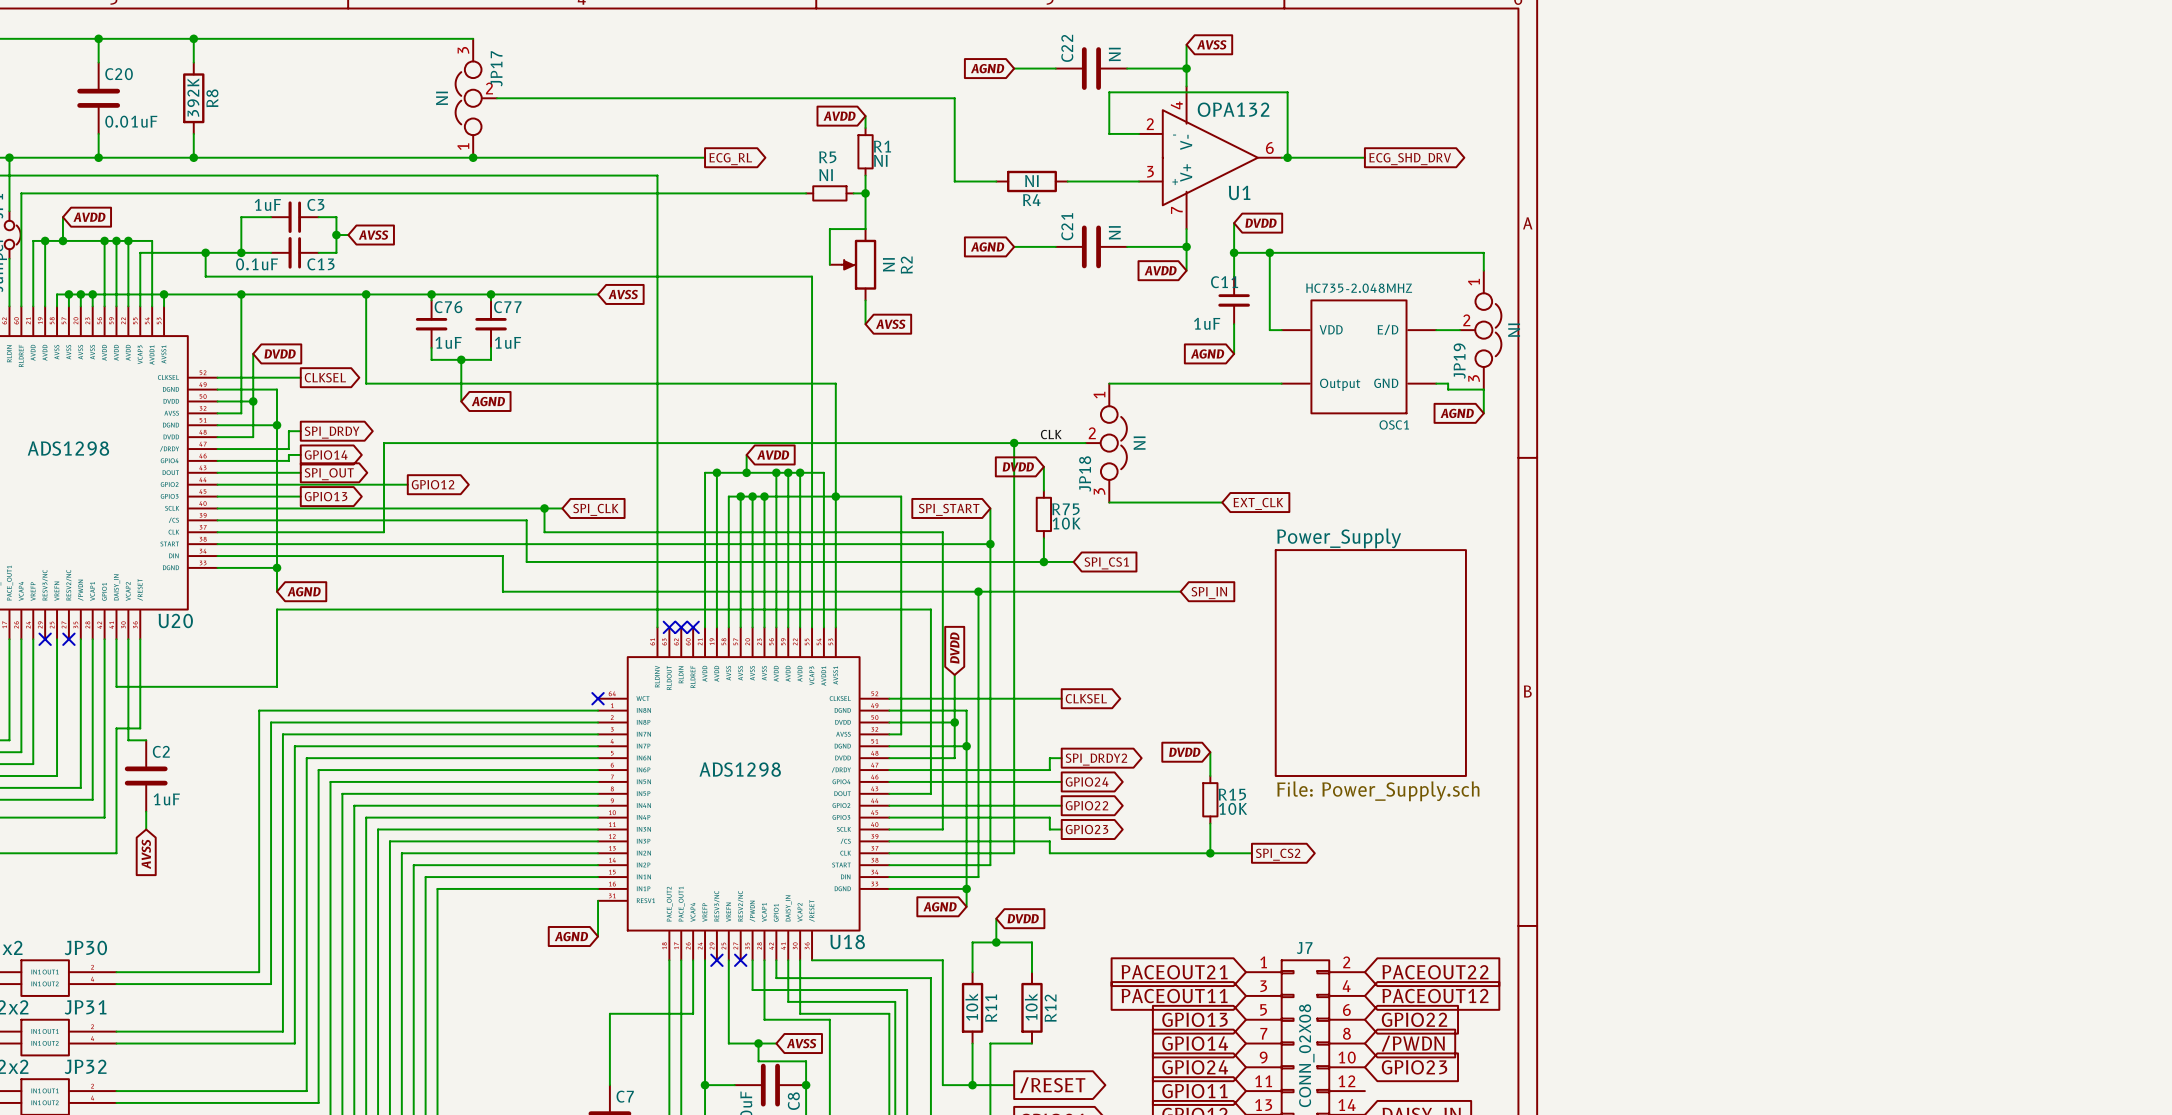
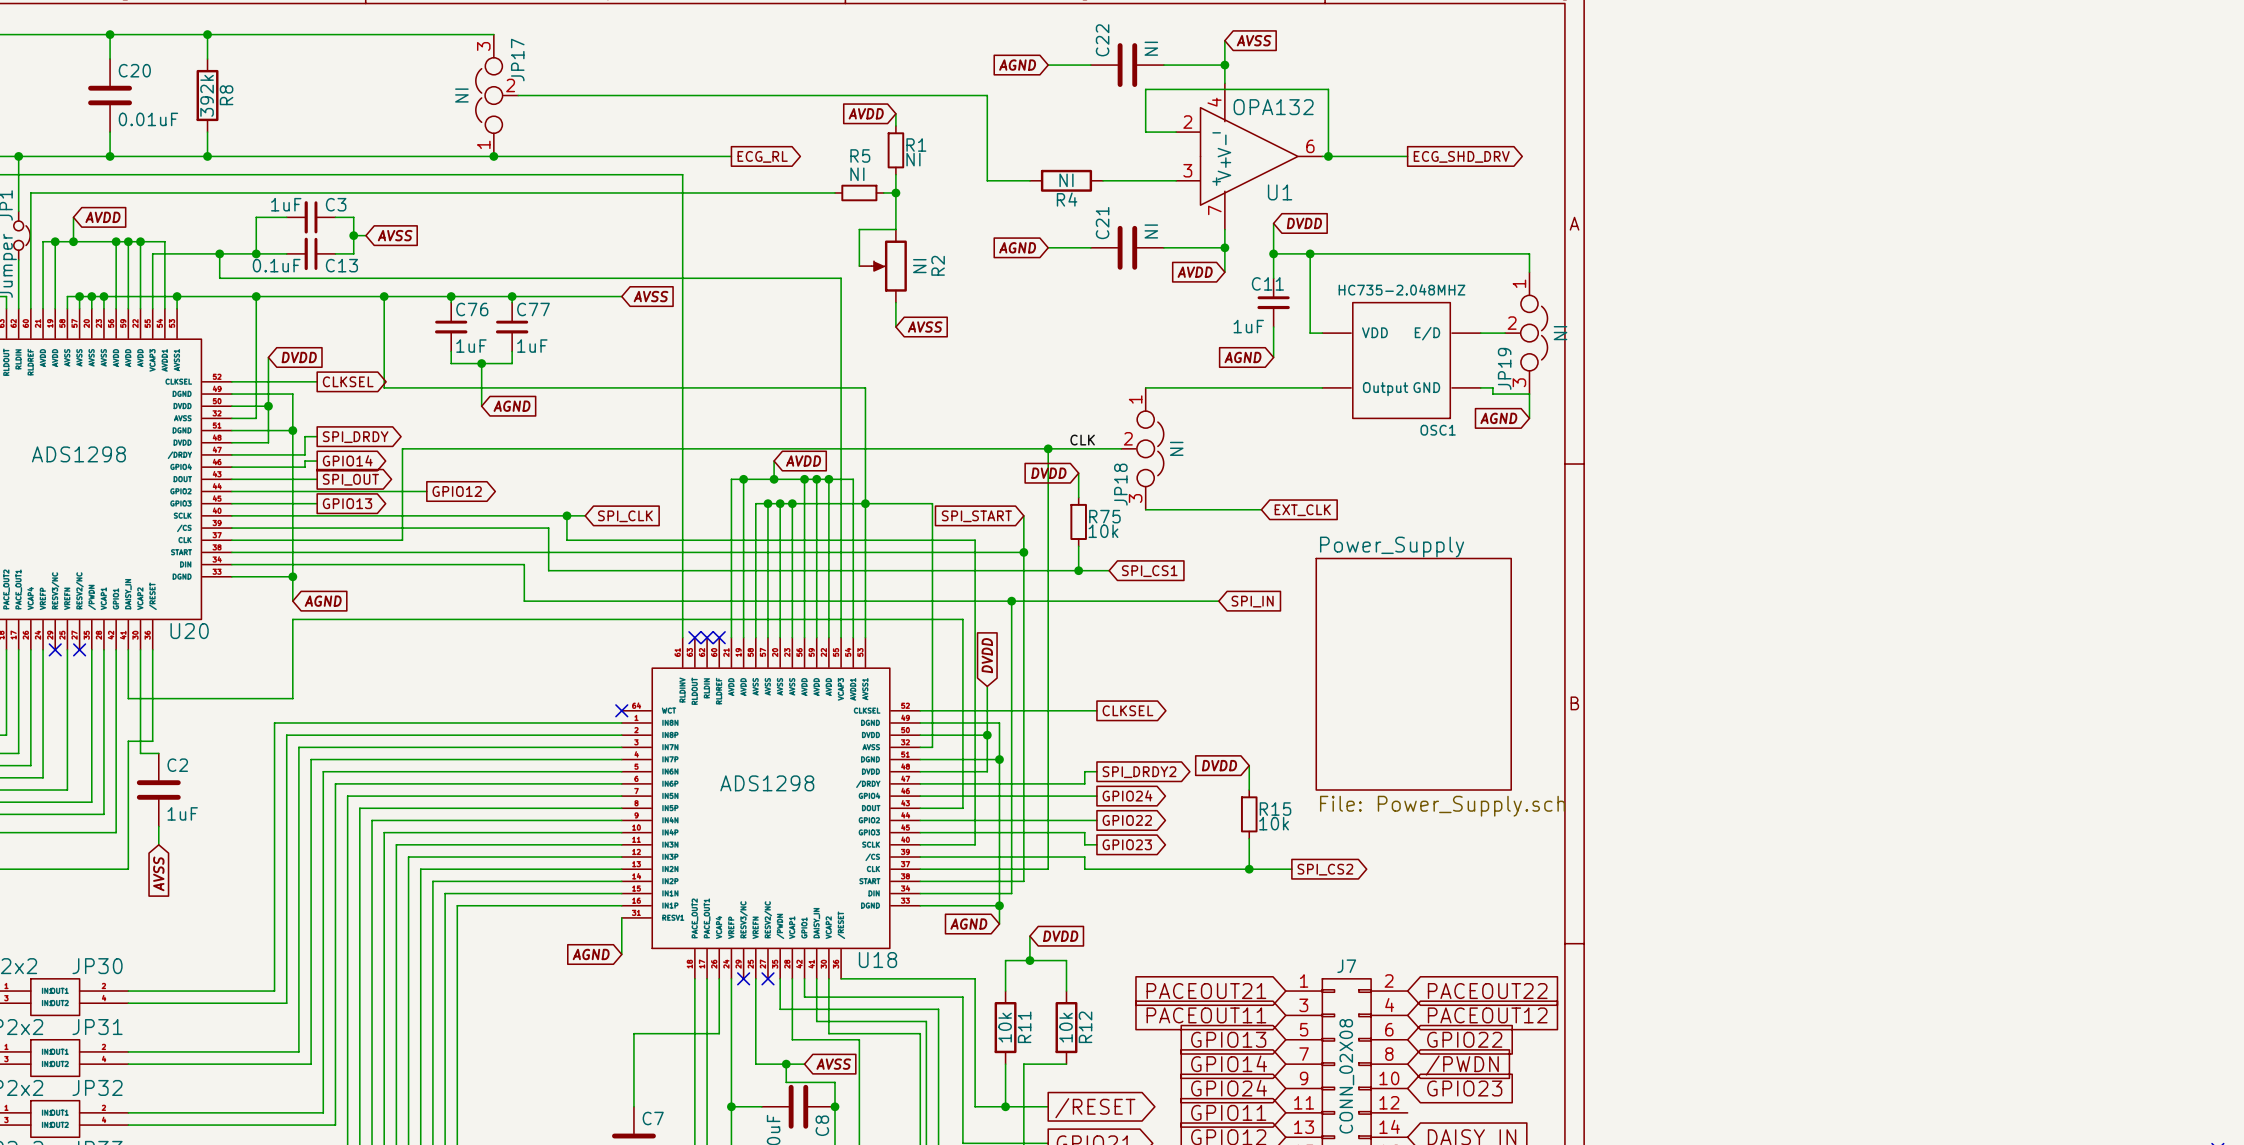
R8 value: 392K (193, 97) -> 392k (207, 95)
R75 value: 10K (1066, 523) -> 10k (1103, 531)
R15 value: 10K (1233, 808) -> 10k (1274, 823)

